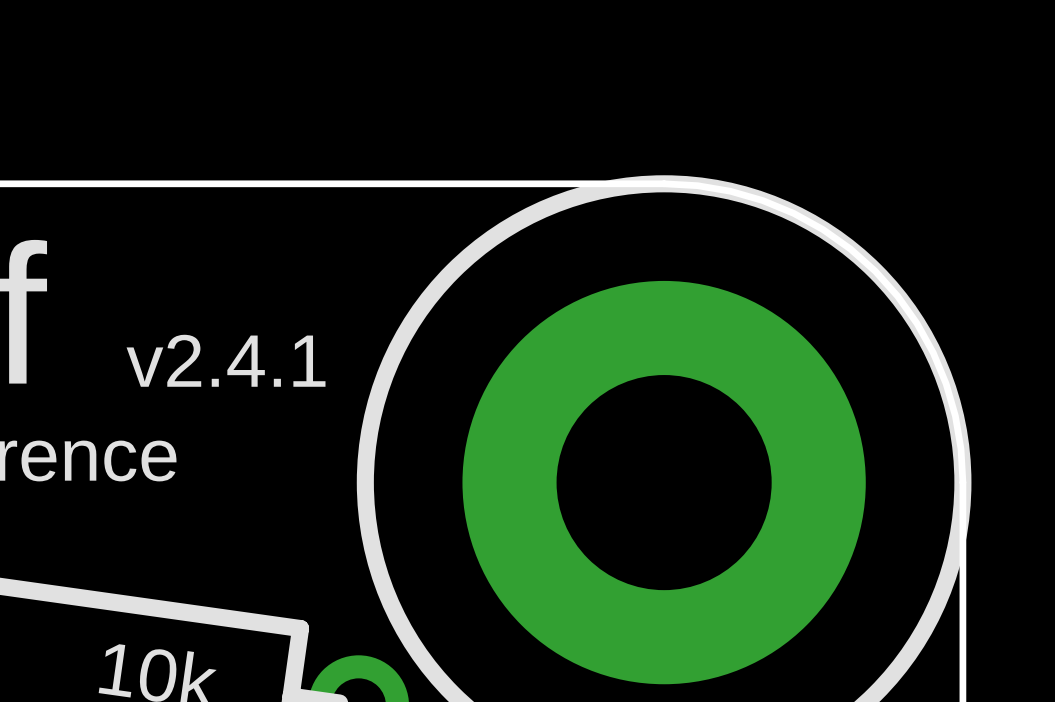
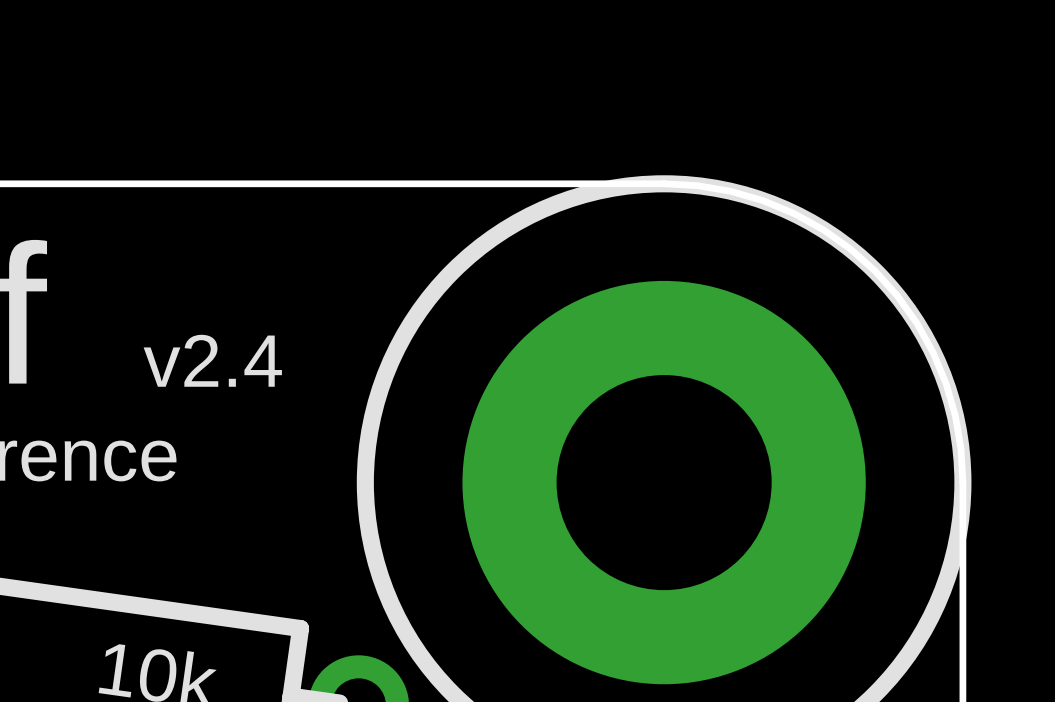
text: v2.4.1 (226, 360) -> v2.4 (212, 360)

